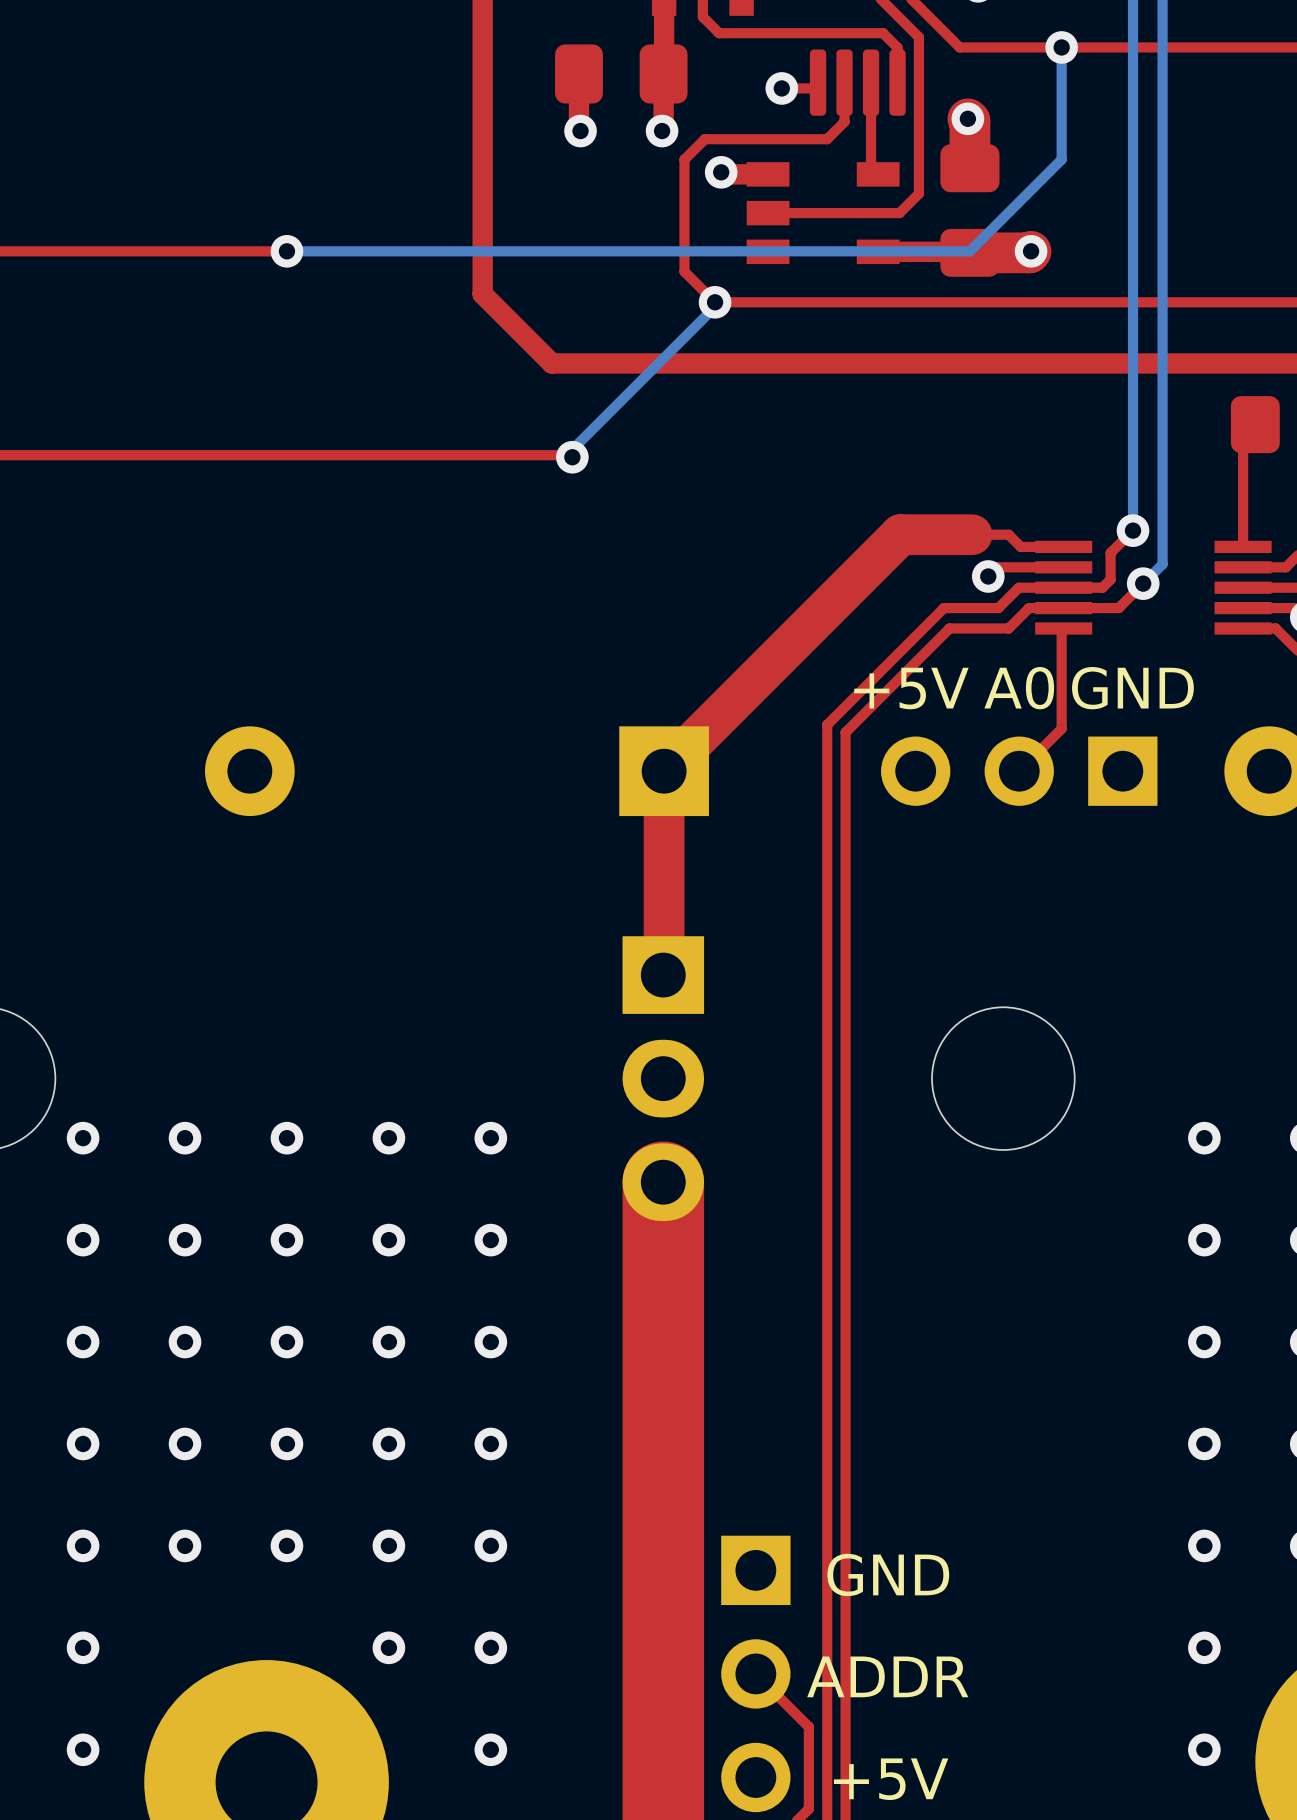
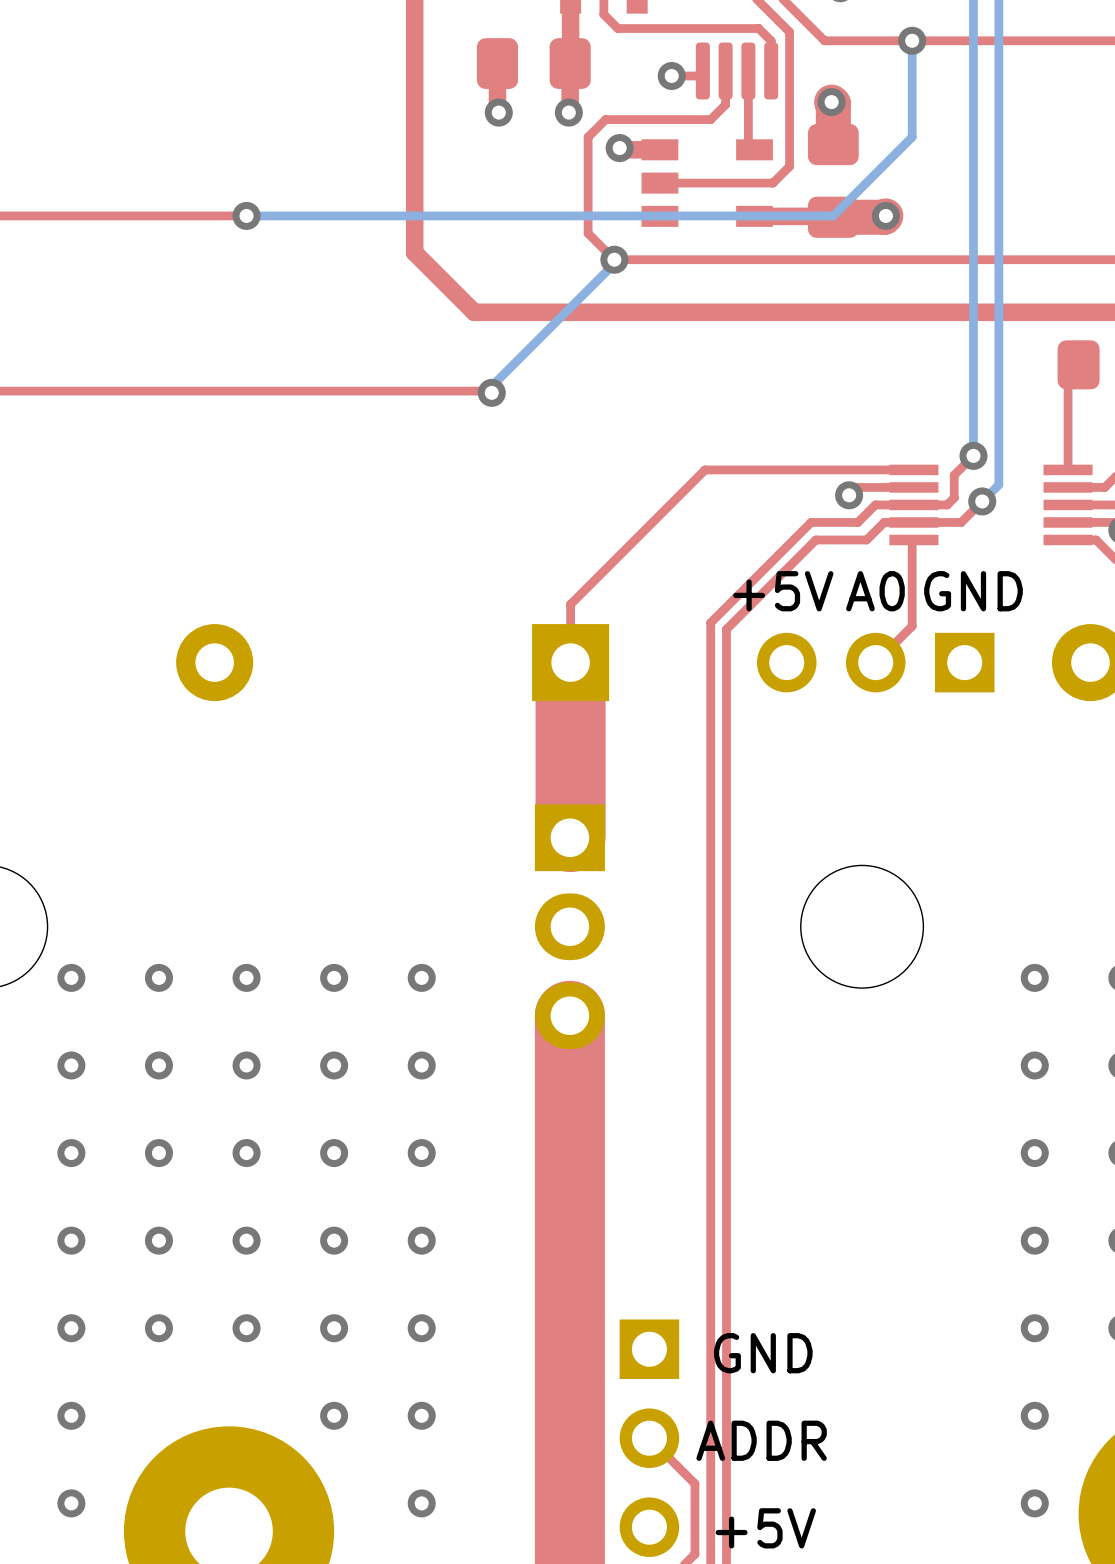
top track: (1020, 546) (1008, 534) (900, 534) (664, 771) -> (877, 469) (705, 469) (570, 604) (570, 662)
top track width: thin (664, 771) (664, 974) -> thick (570, 662) (570, 837)

